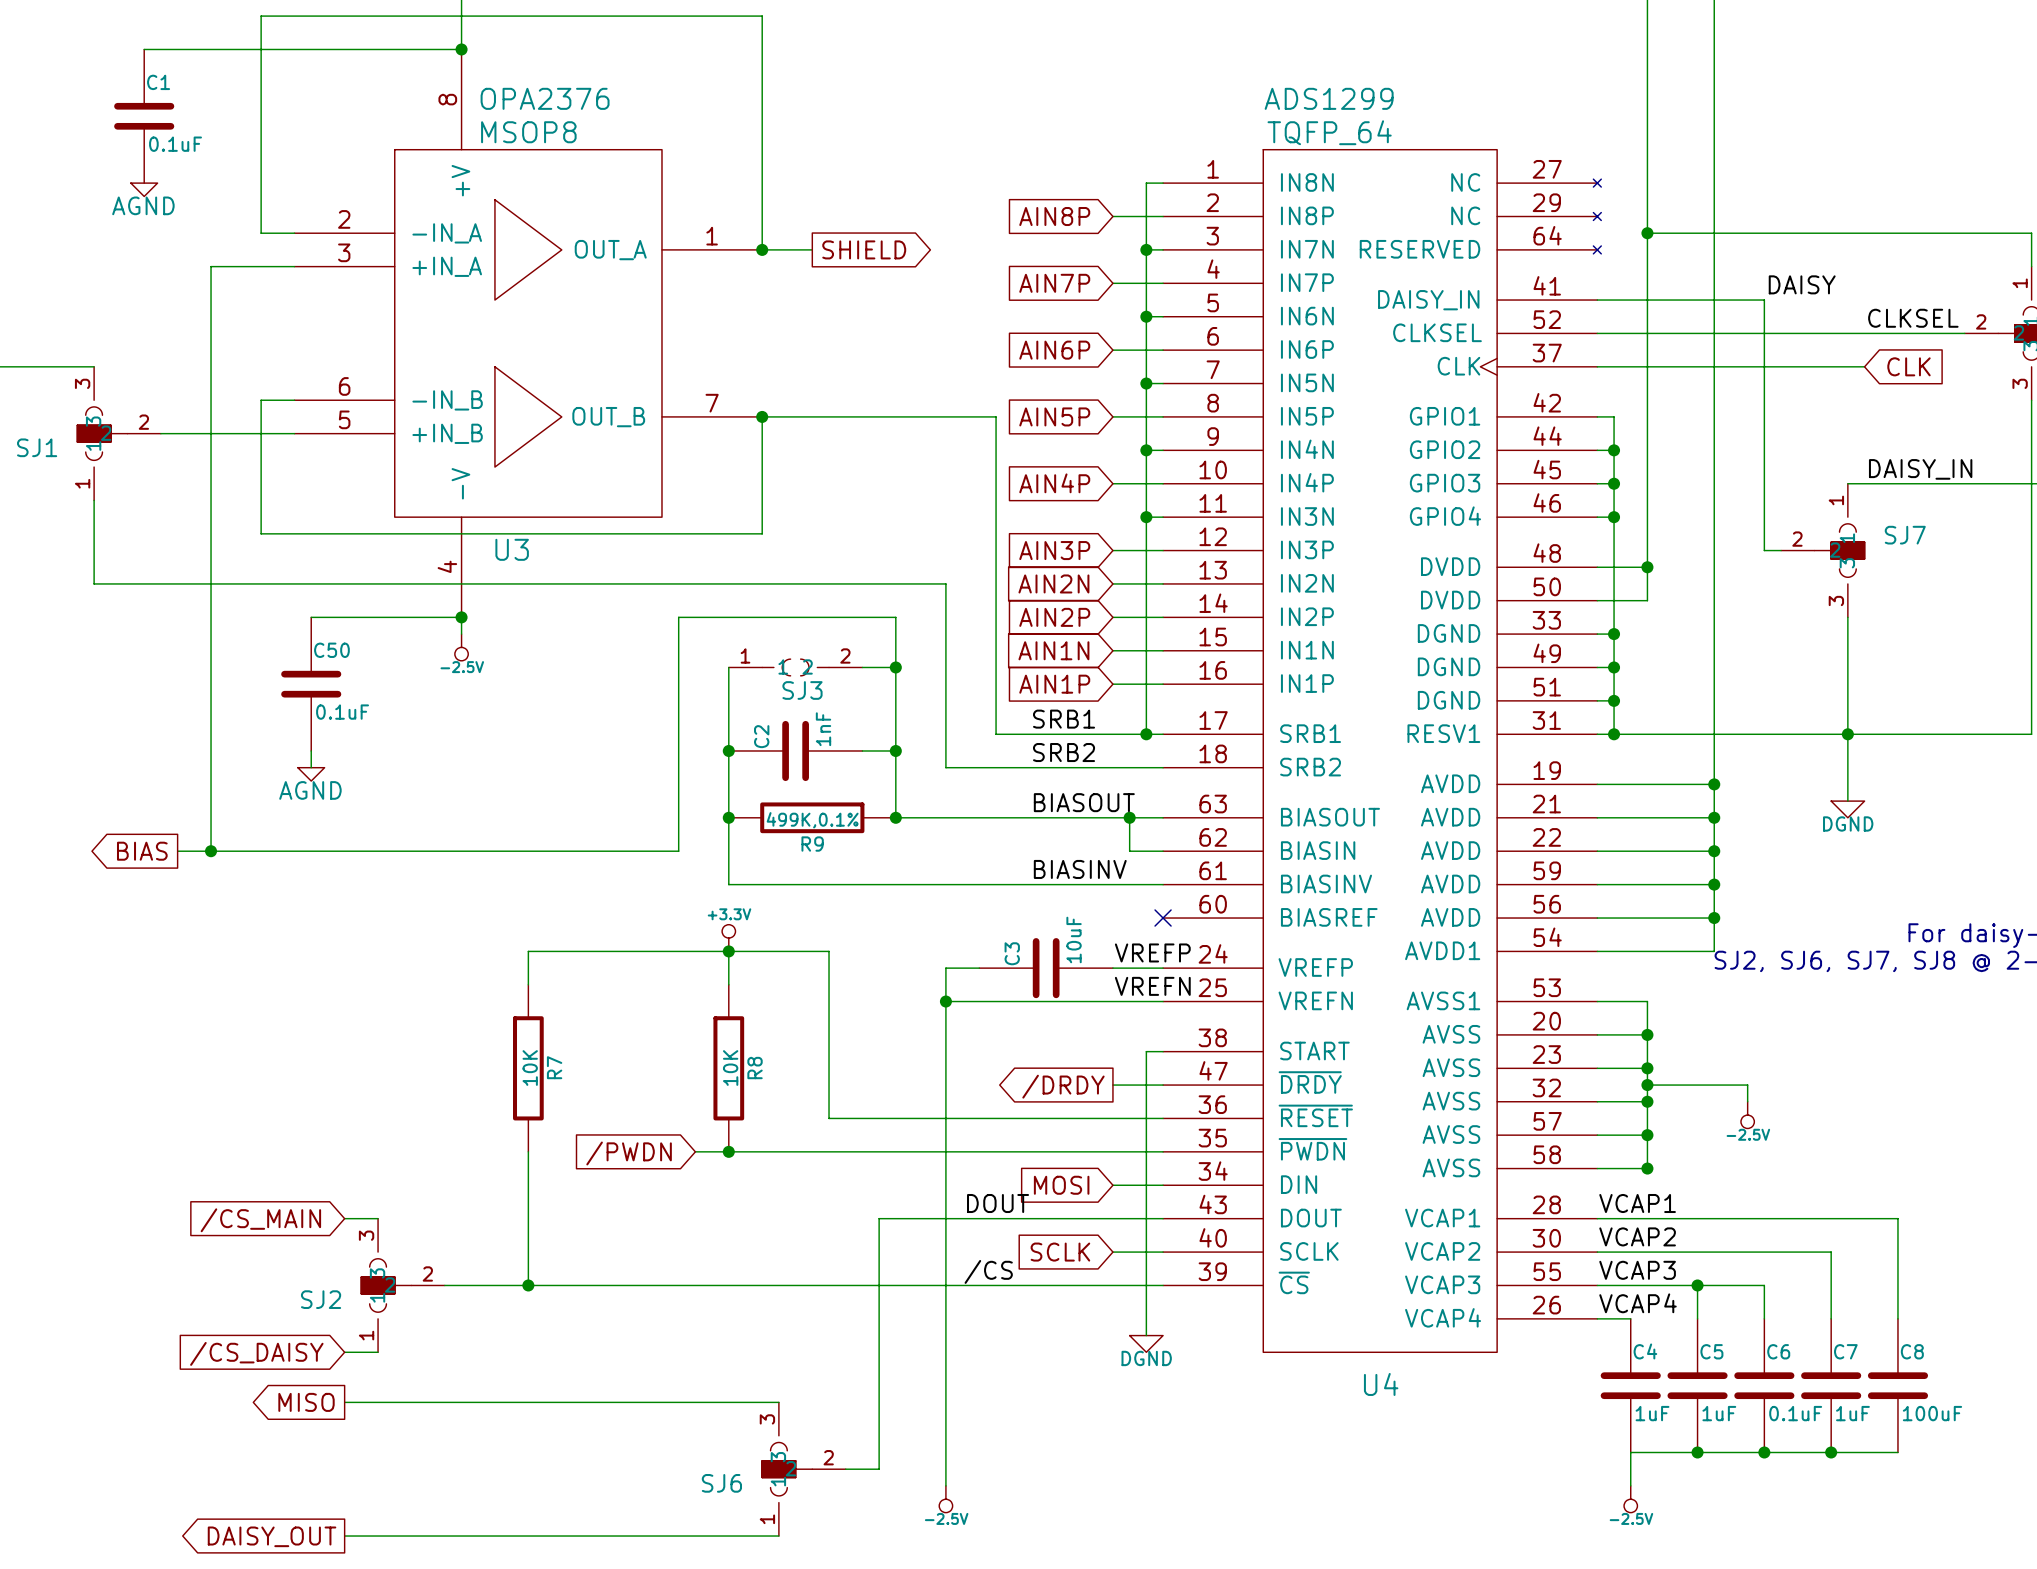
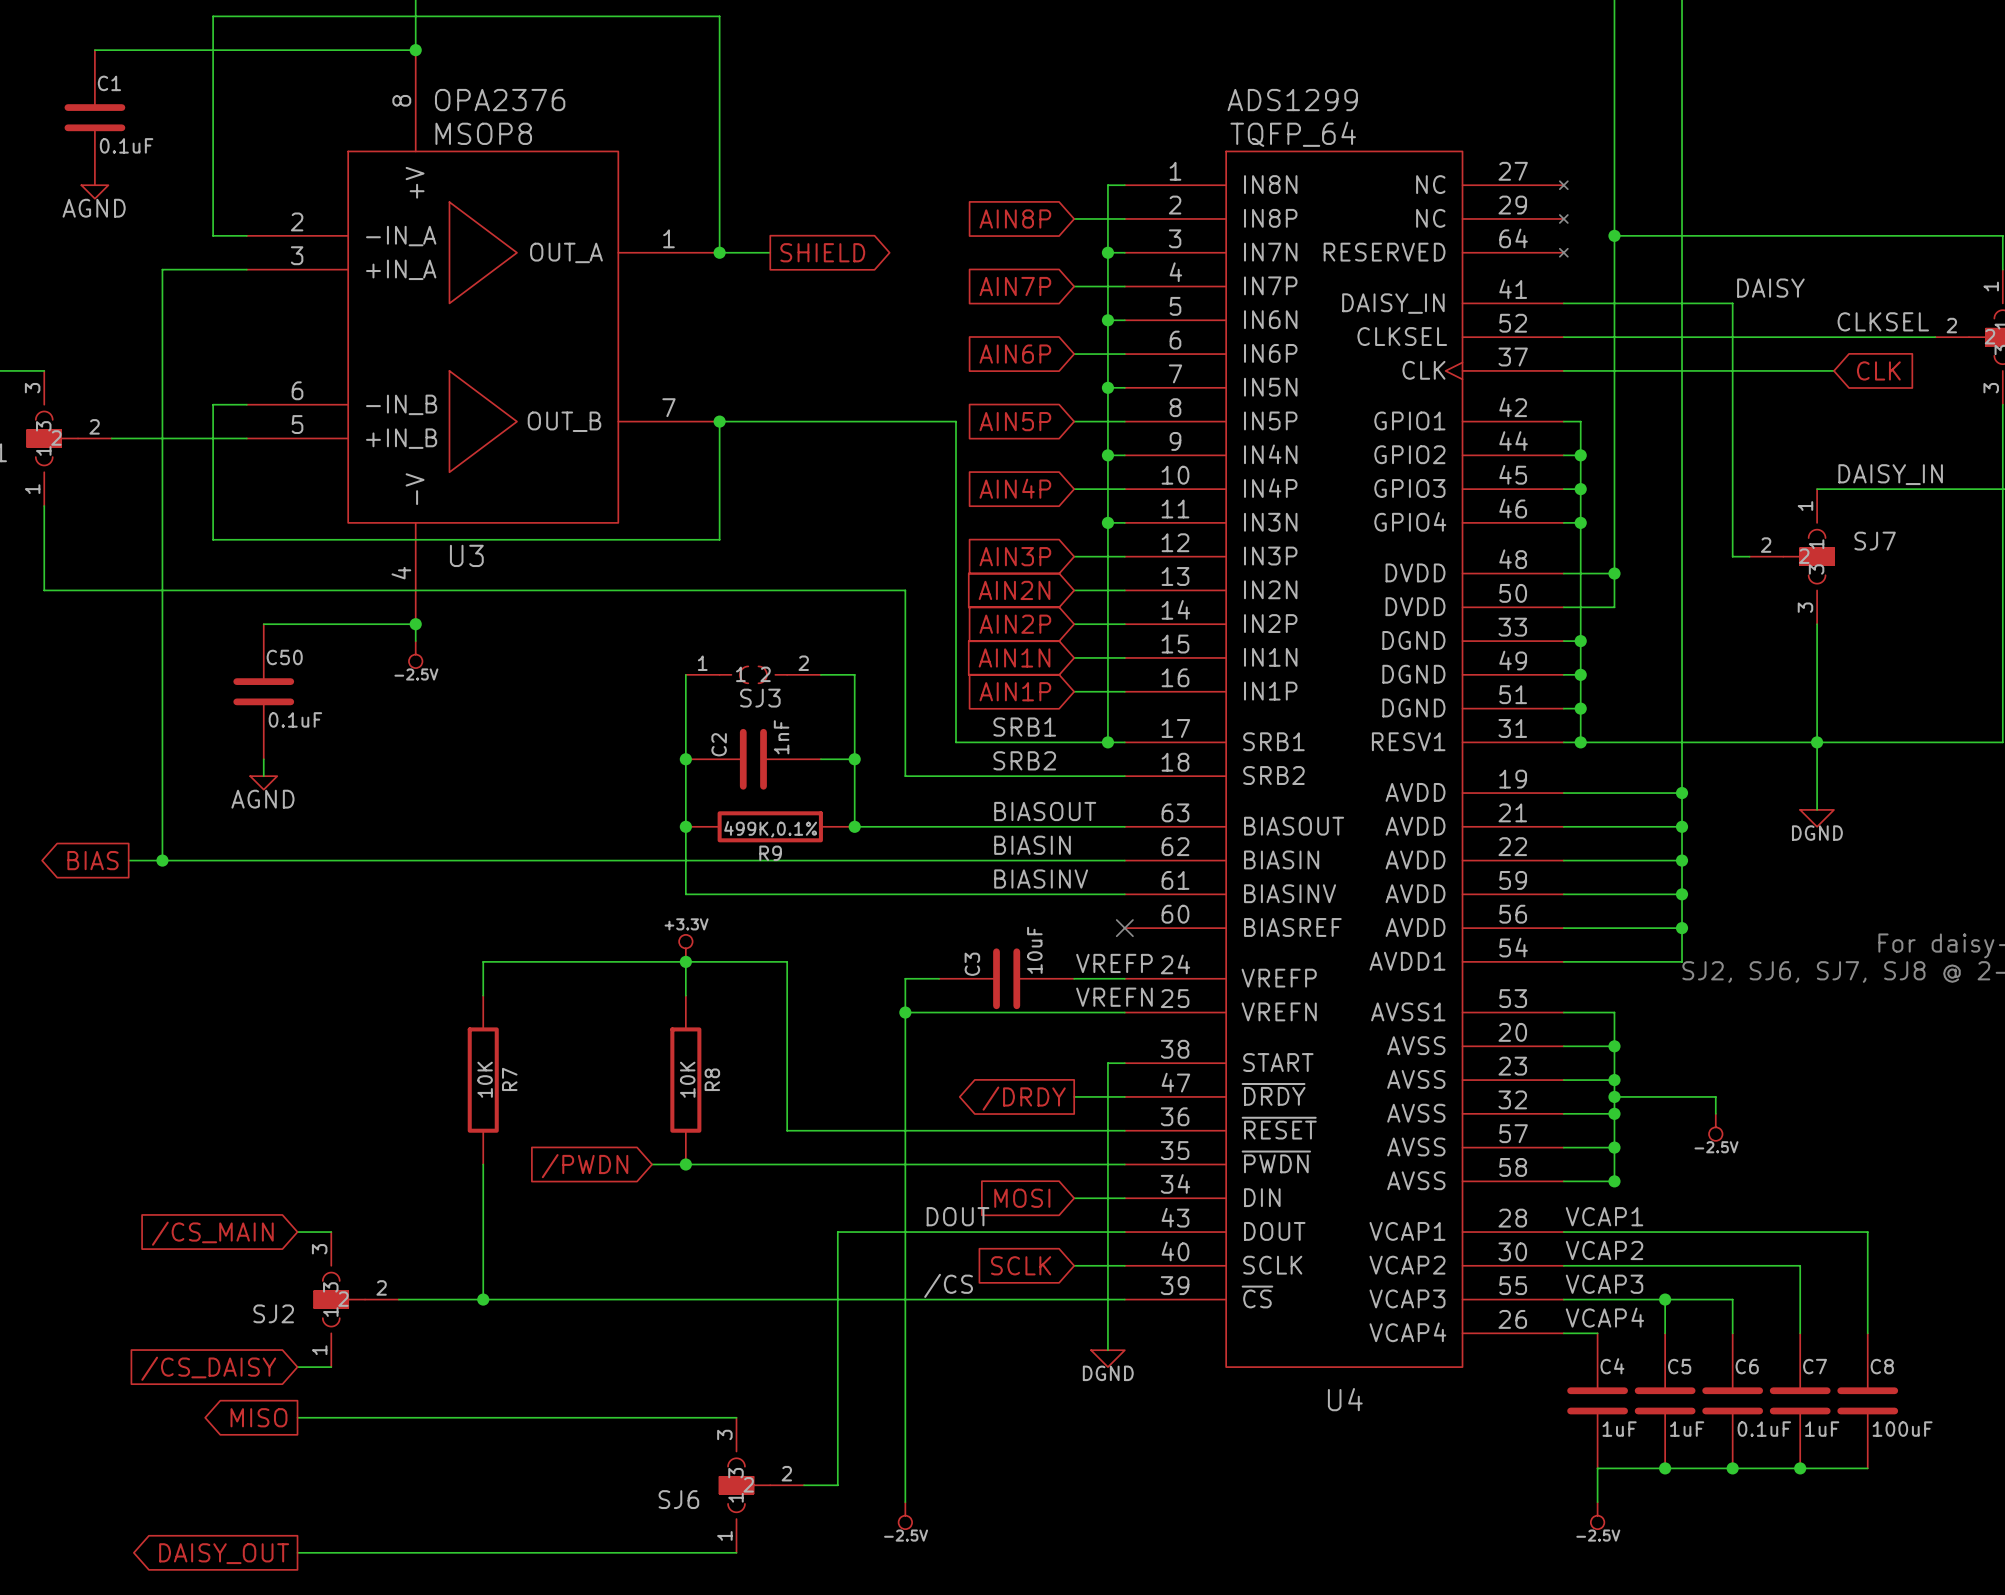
wire: (895, 667) (895, 617) (678, 617) (678, 851) -> (1091, 860) (635, 860)
junction: (895, 667) -> none
wire: (1129, 817) (1129, 851) -> none
junction: (1129, 817) -> none
label: none -> BIASIN (1032, 845)

